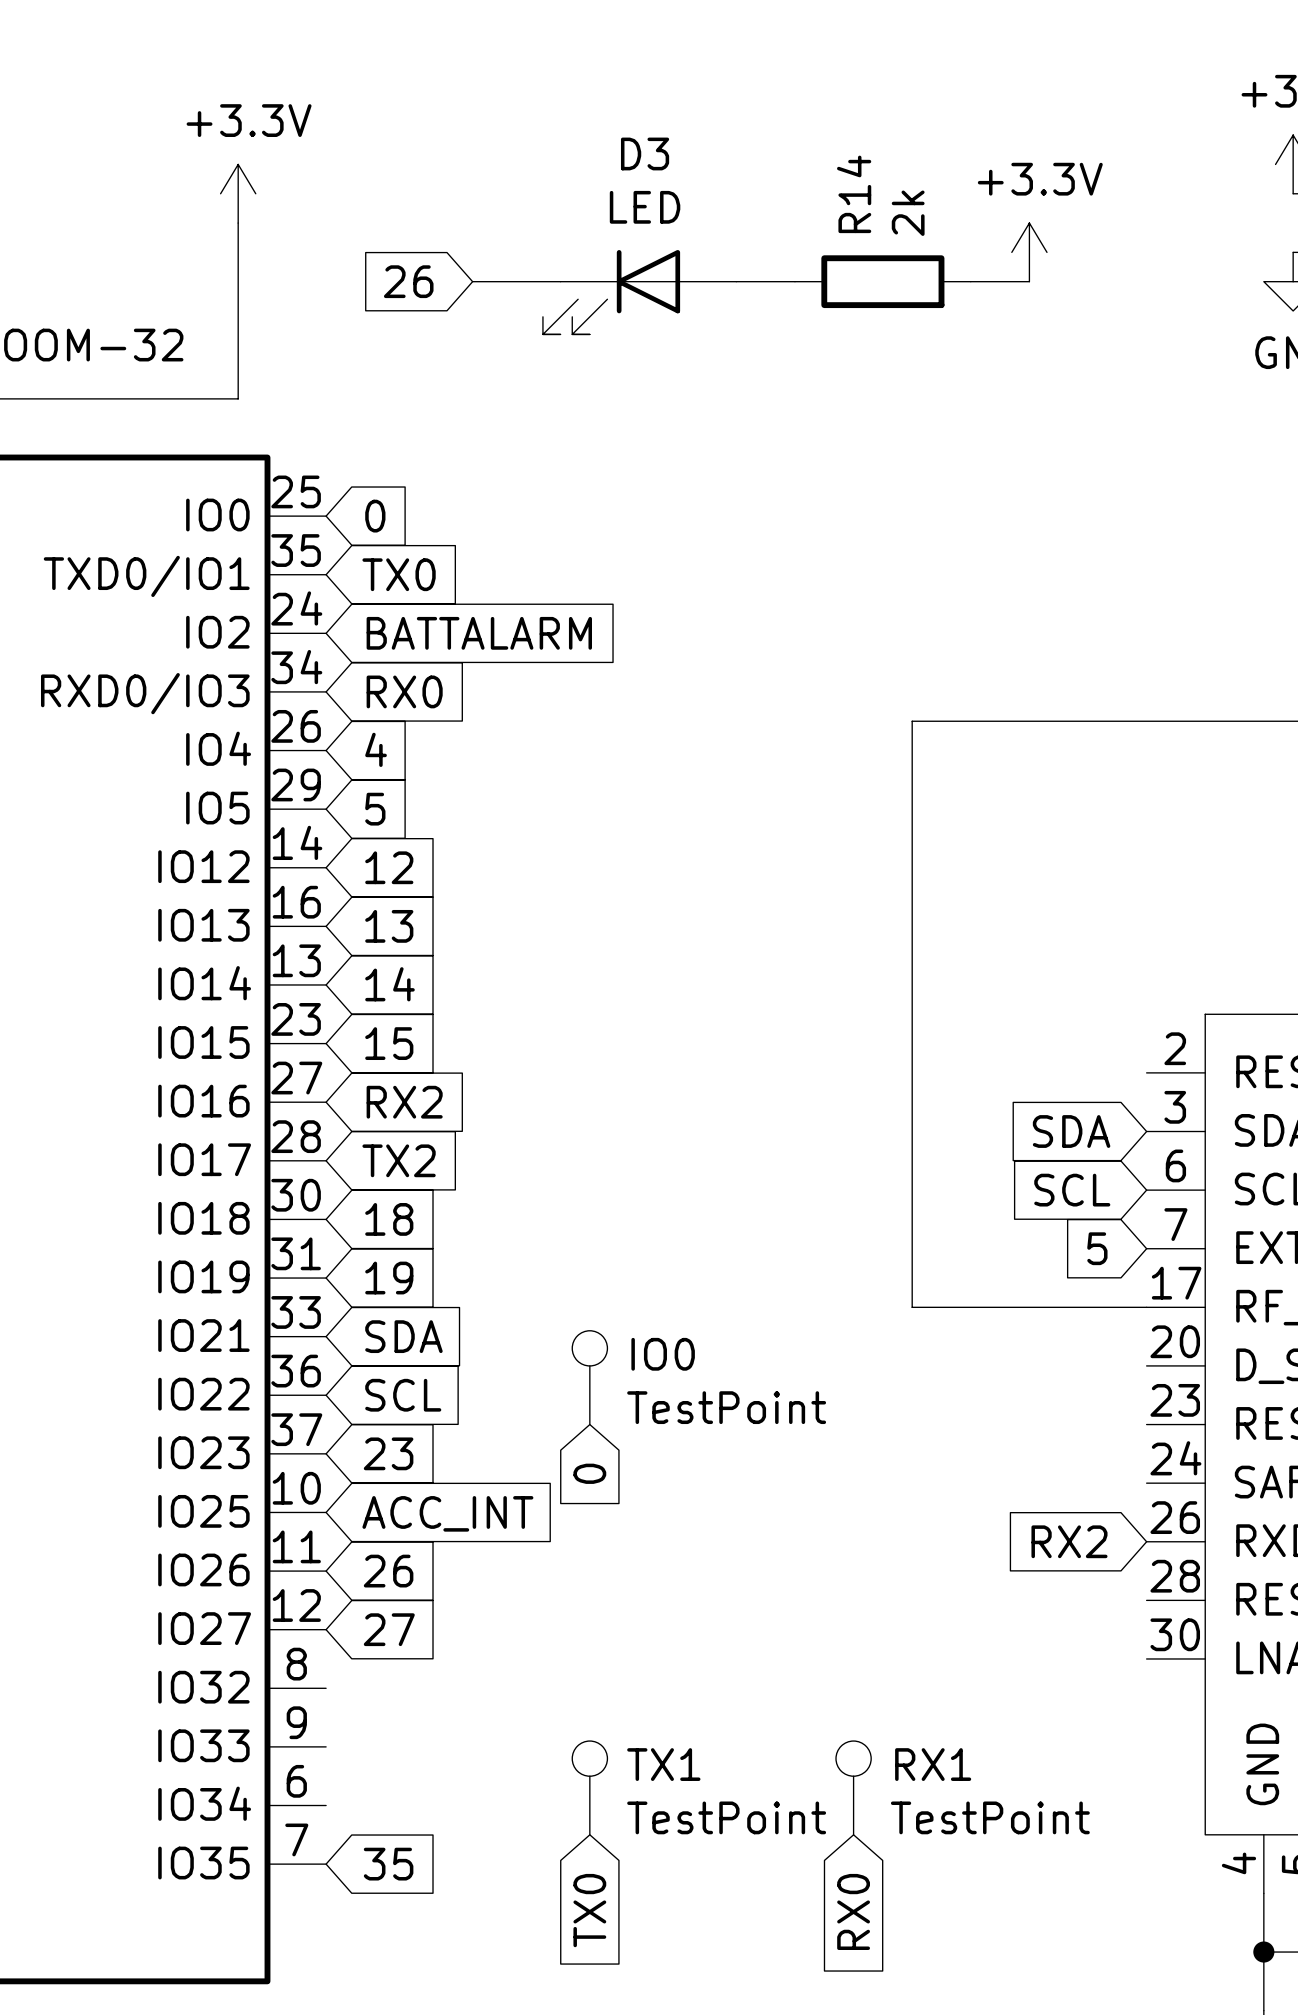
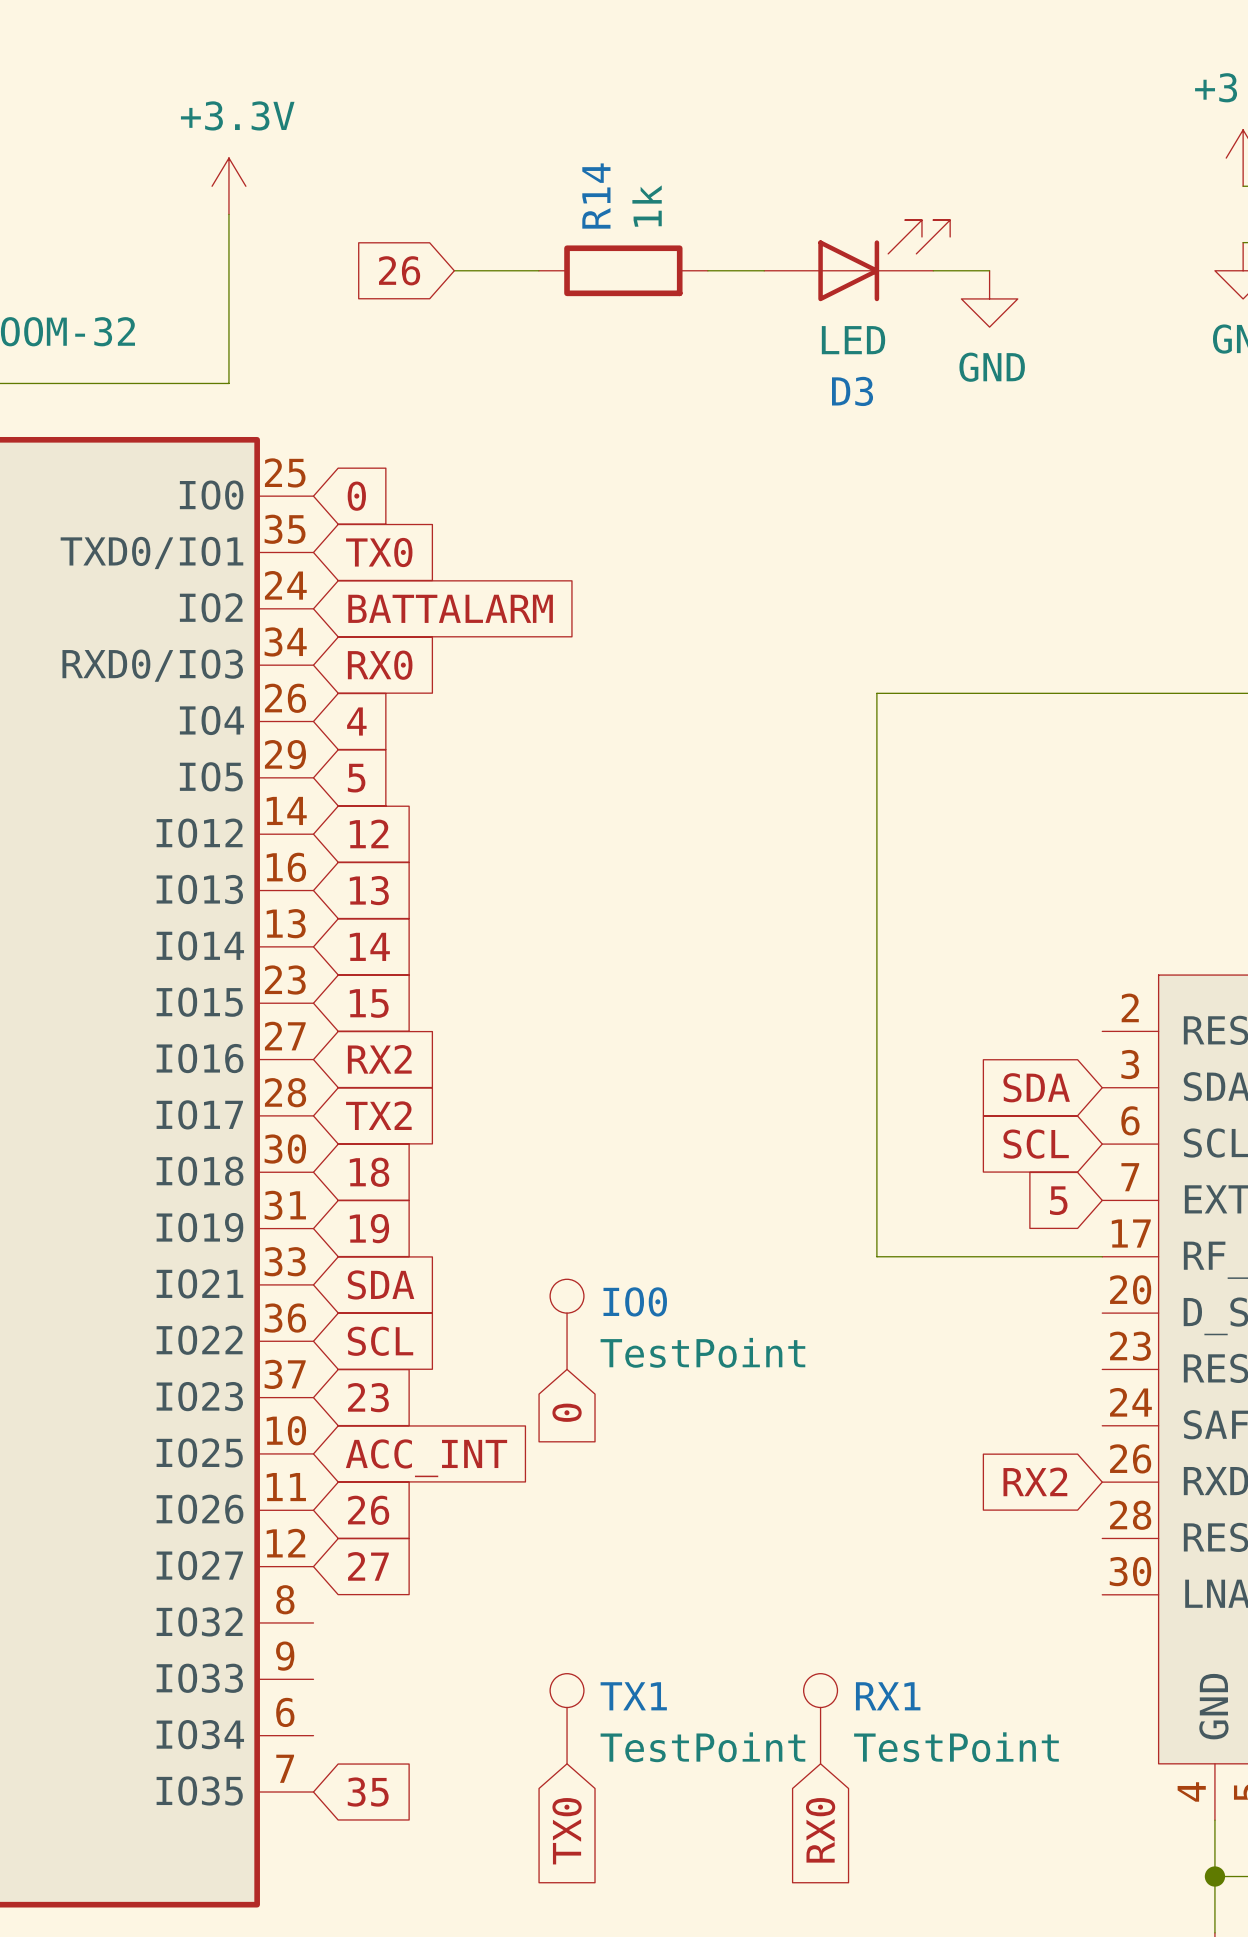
R14 value: 2k (908, 213) -> 1k (647, 206)
power symbol: +3.3V (1029, 252) -> none
R14 position: (882, 281) -> (623, 270)
D3 rotation: 0° (611, 292) -> 180° (884, 260)
D3 position: (639, 292) -> (857, 260)
power symbol: none -> GND (989, 298)

